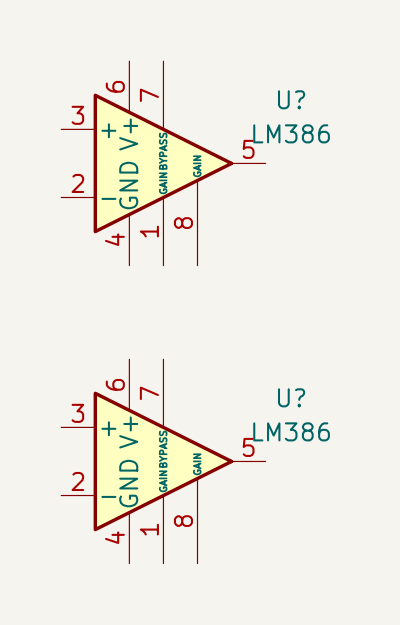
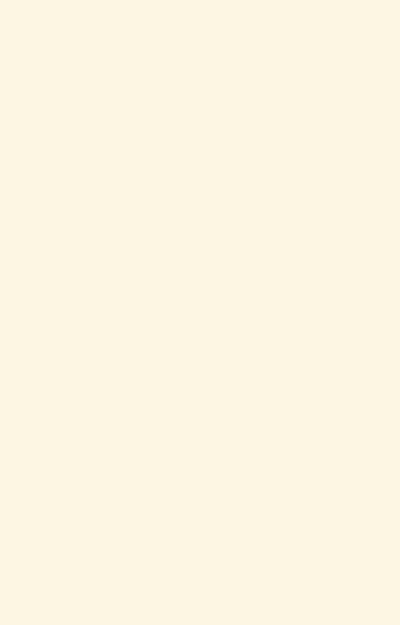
U?: LM386 (163, 163) -> none
U?: LM386 (163, 461) -> none

